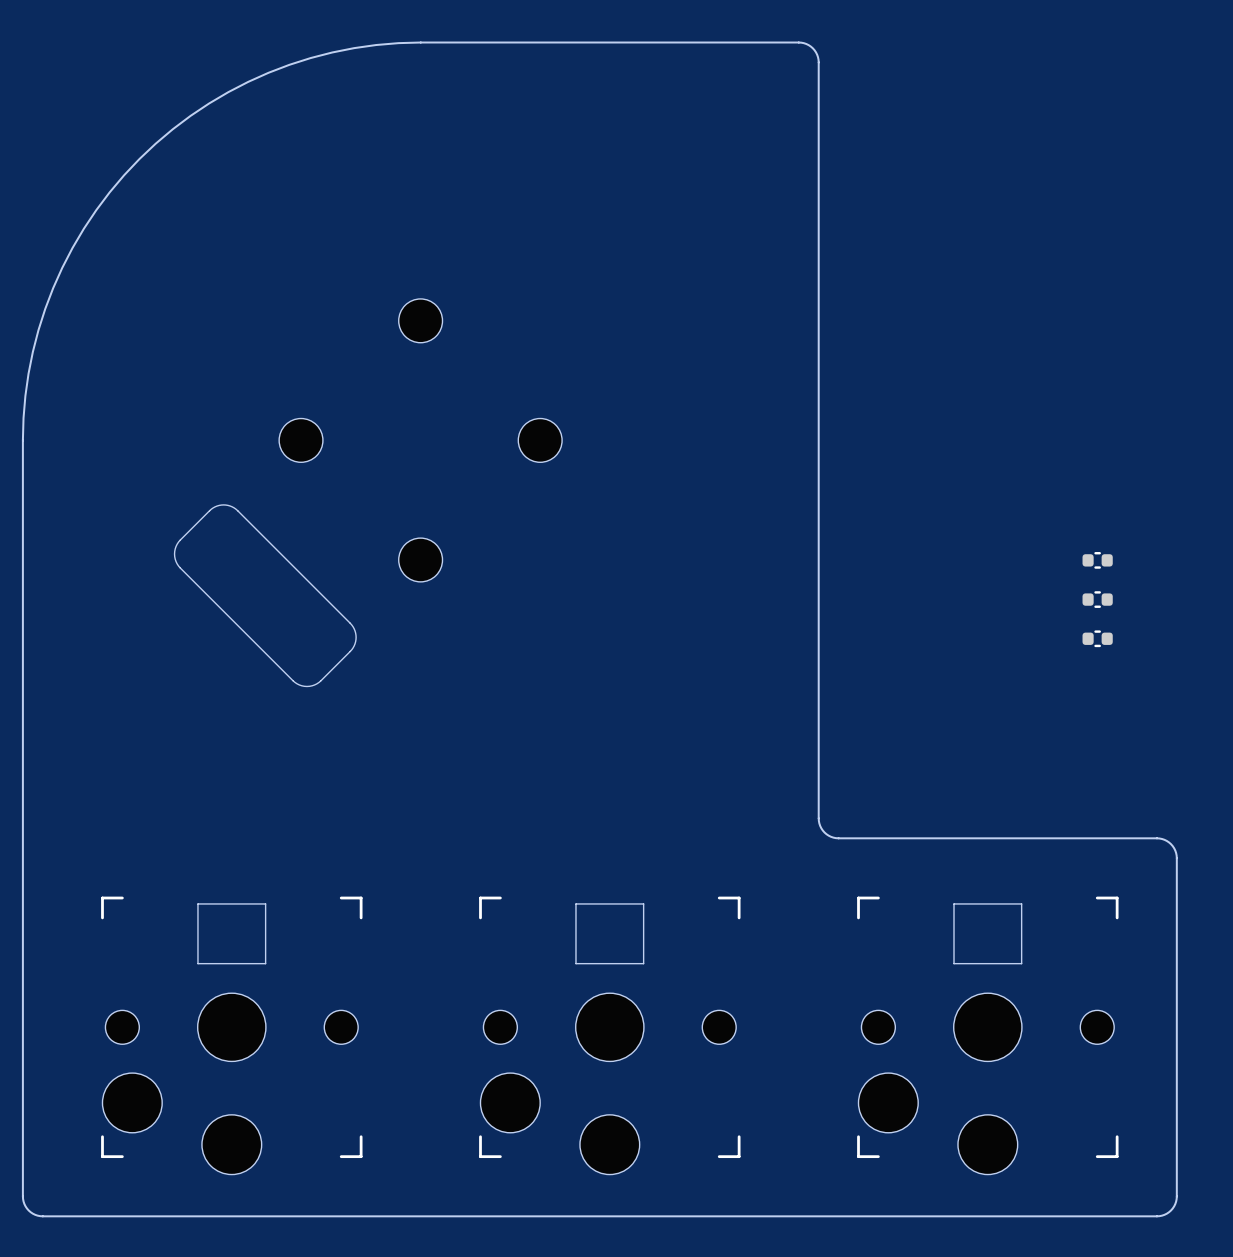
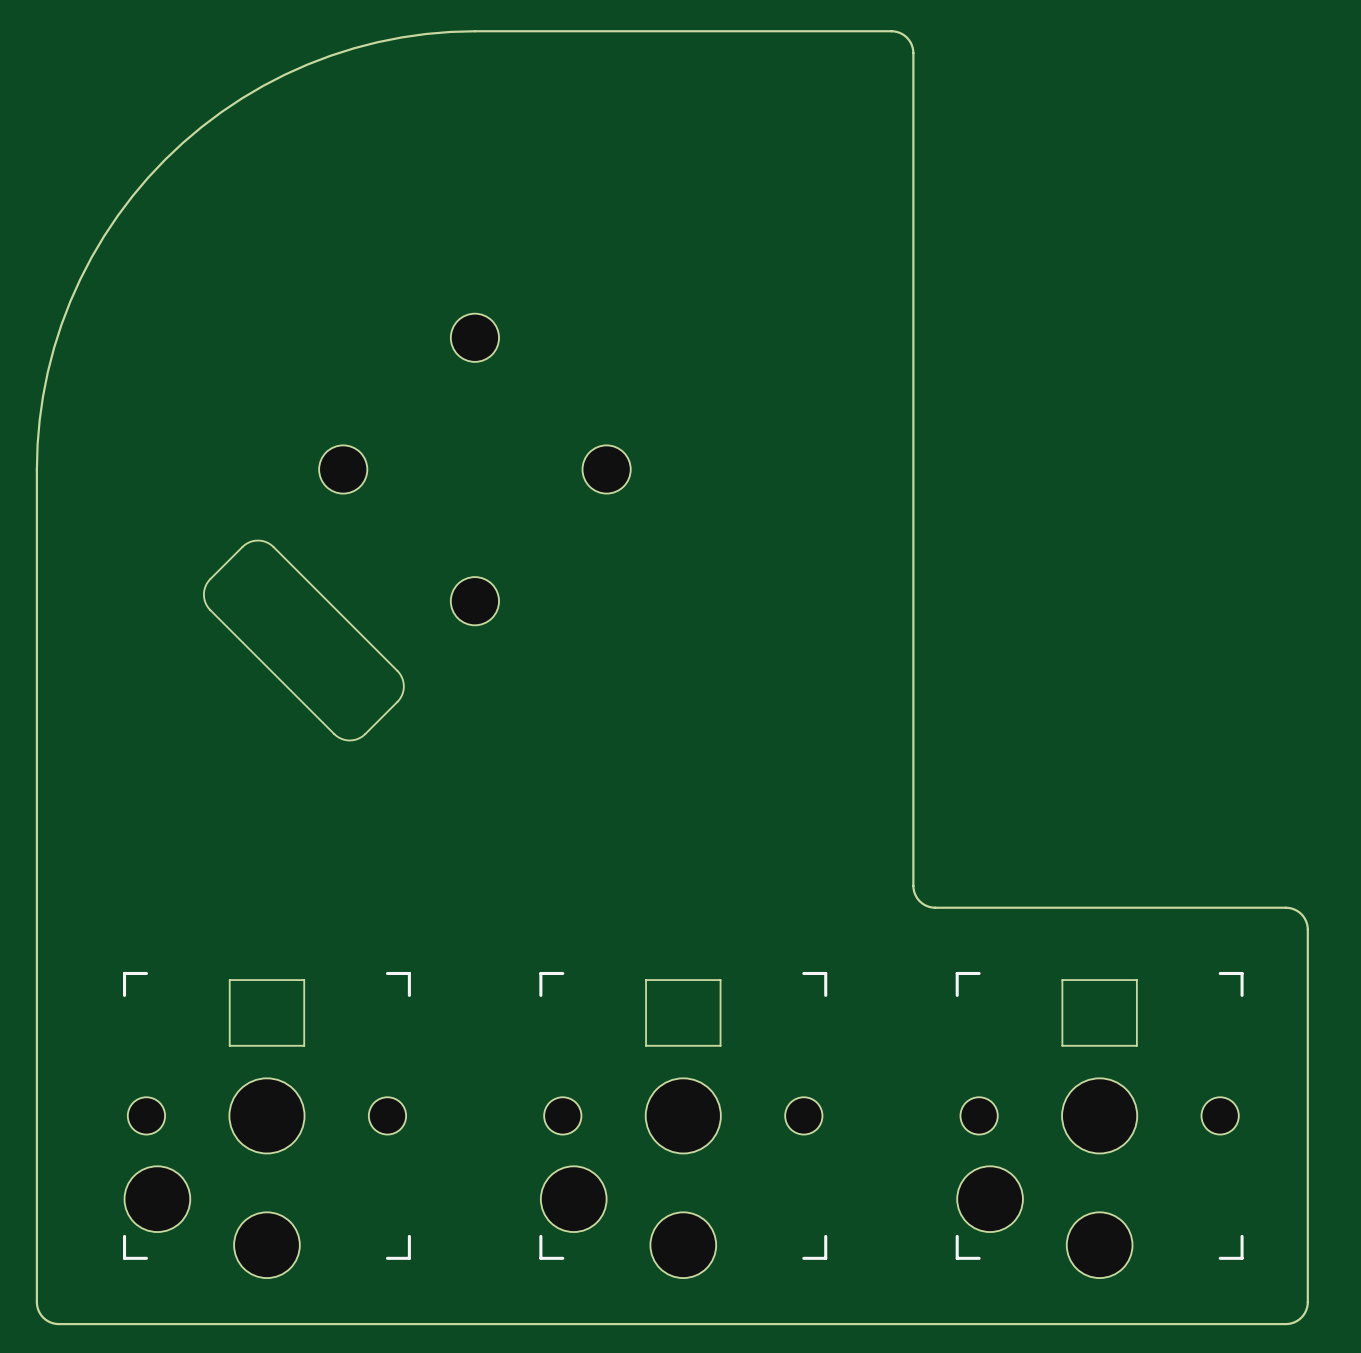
part: (1097, 560) -> none
part: (1097, 599) -> none
part: (1097, 638) -> none

